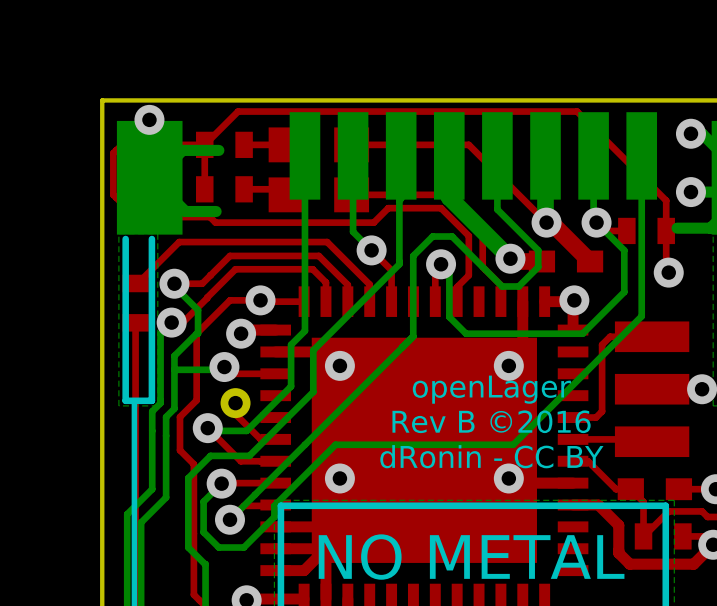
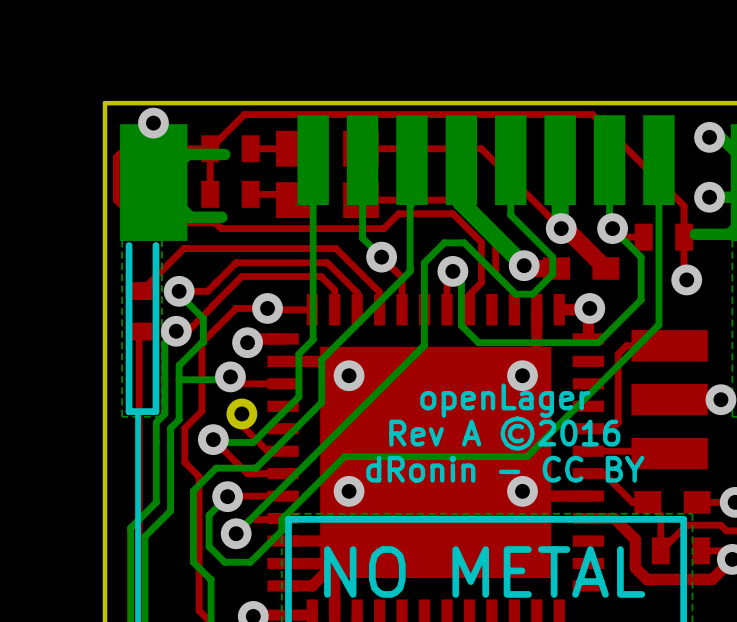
text: Rev B ©2016 (491, 421) -> Rev A ©2016 (504, 433)

